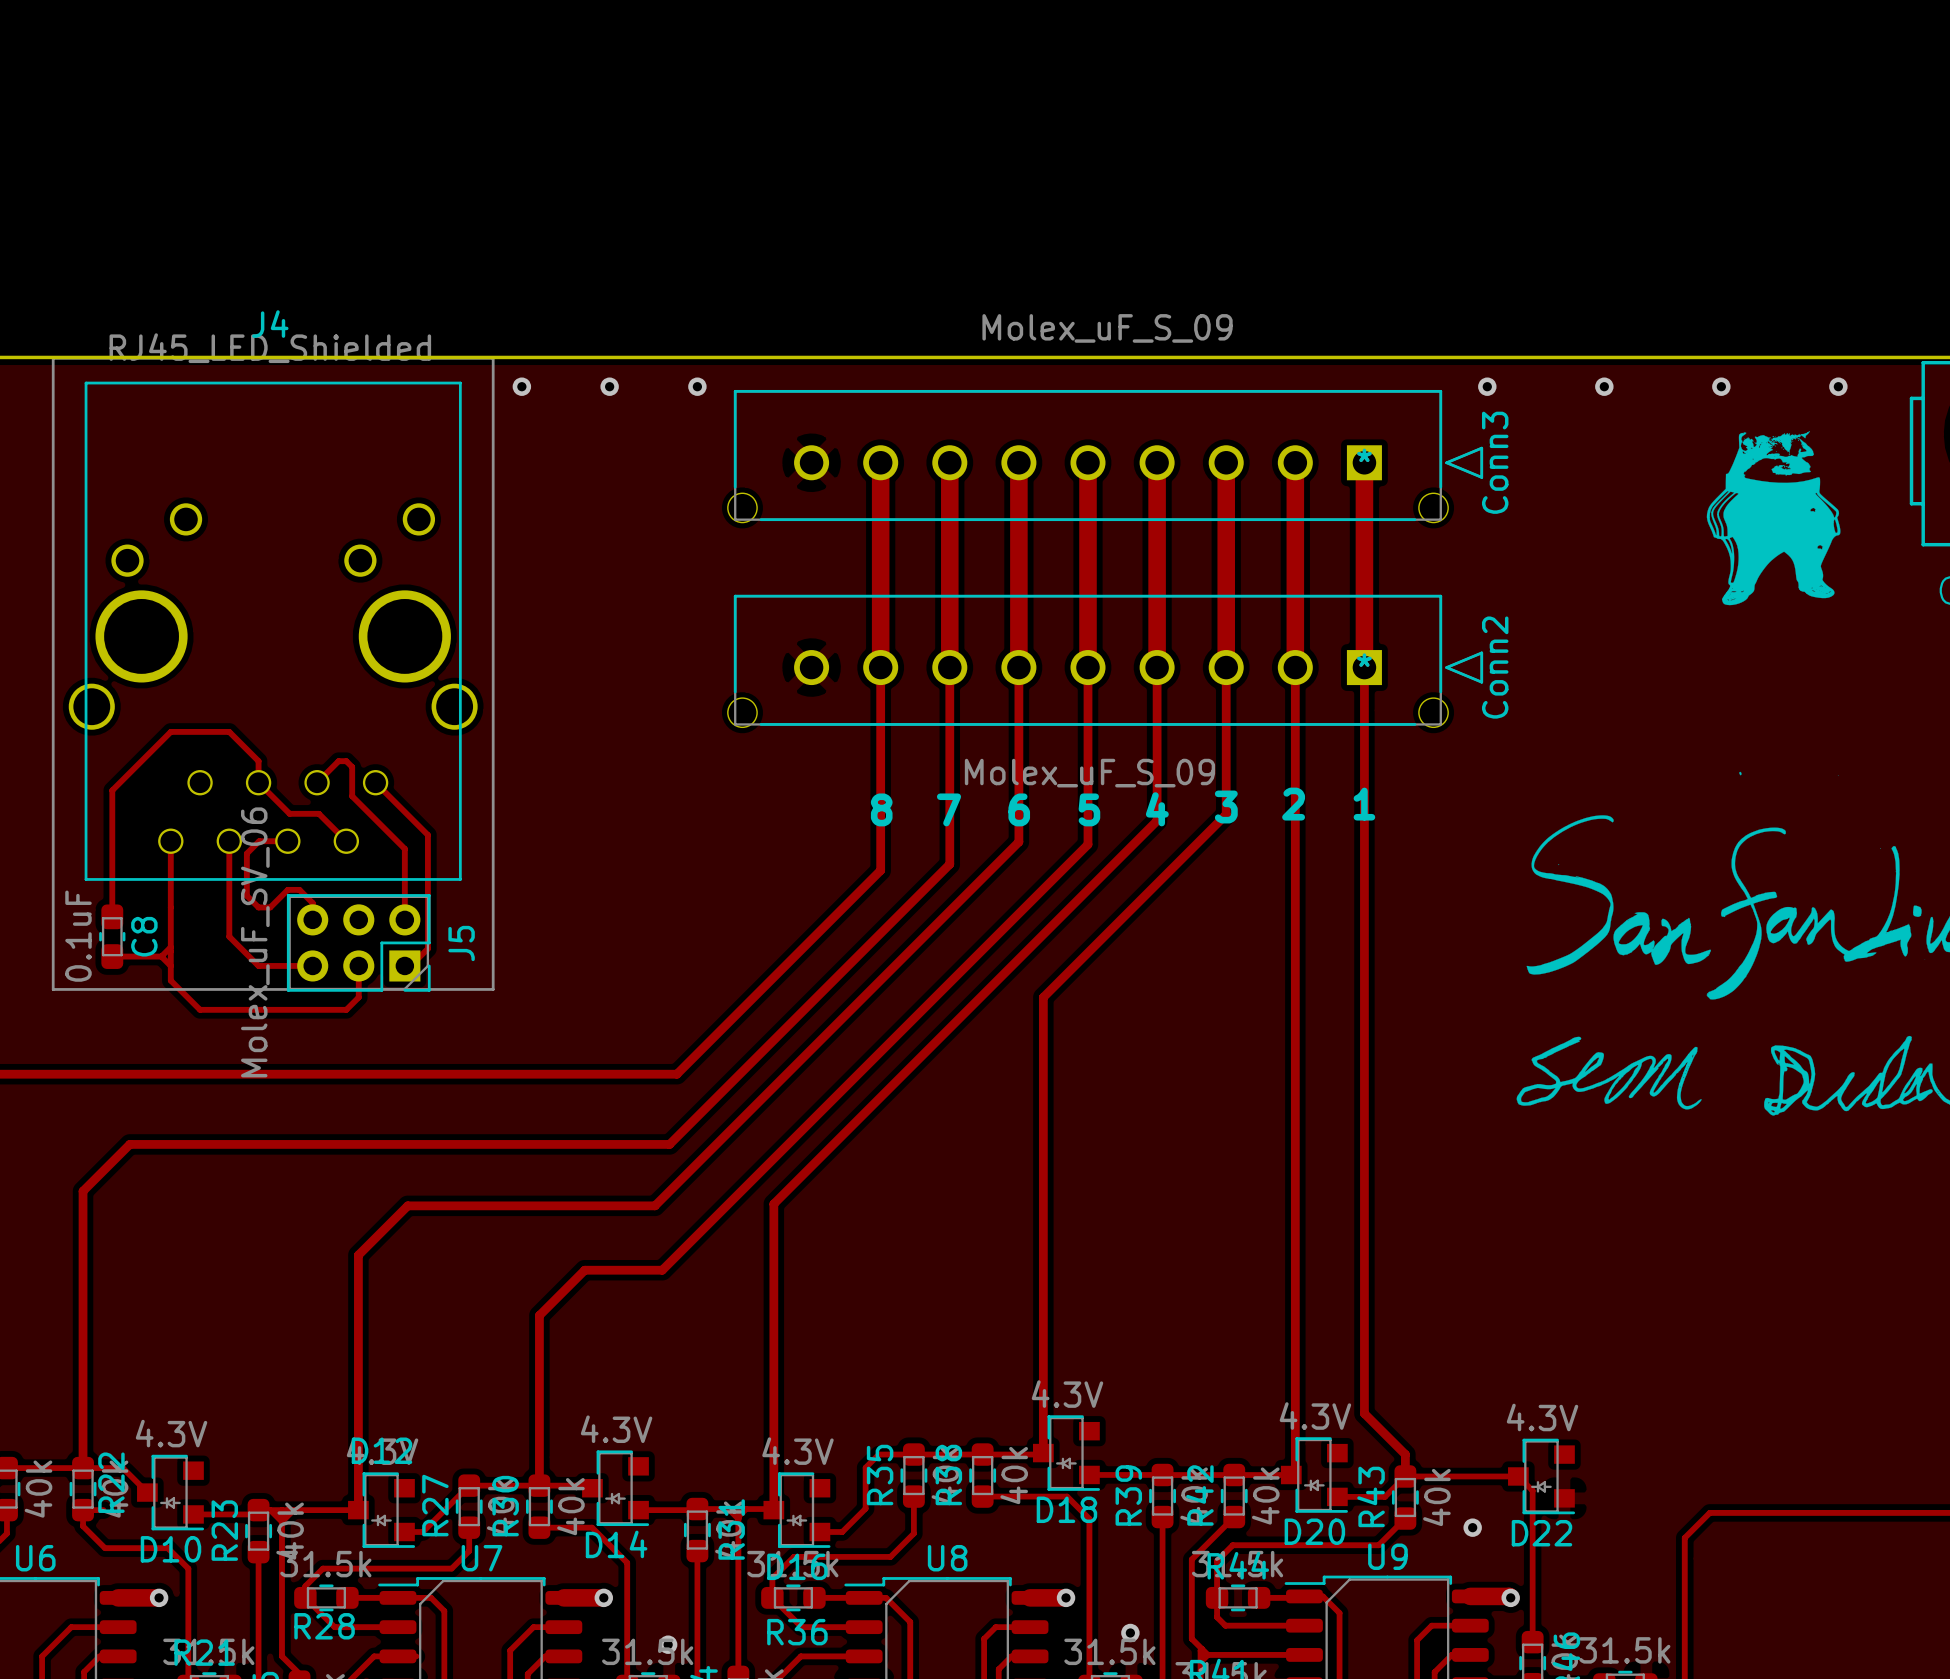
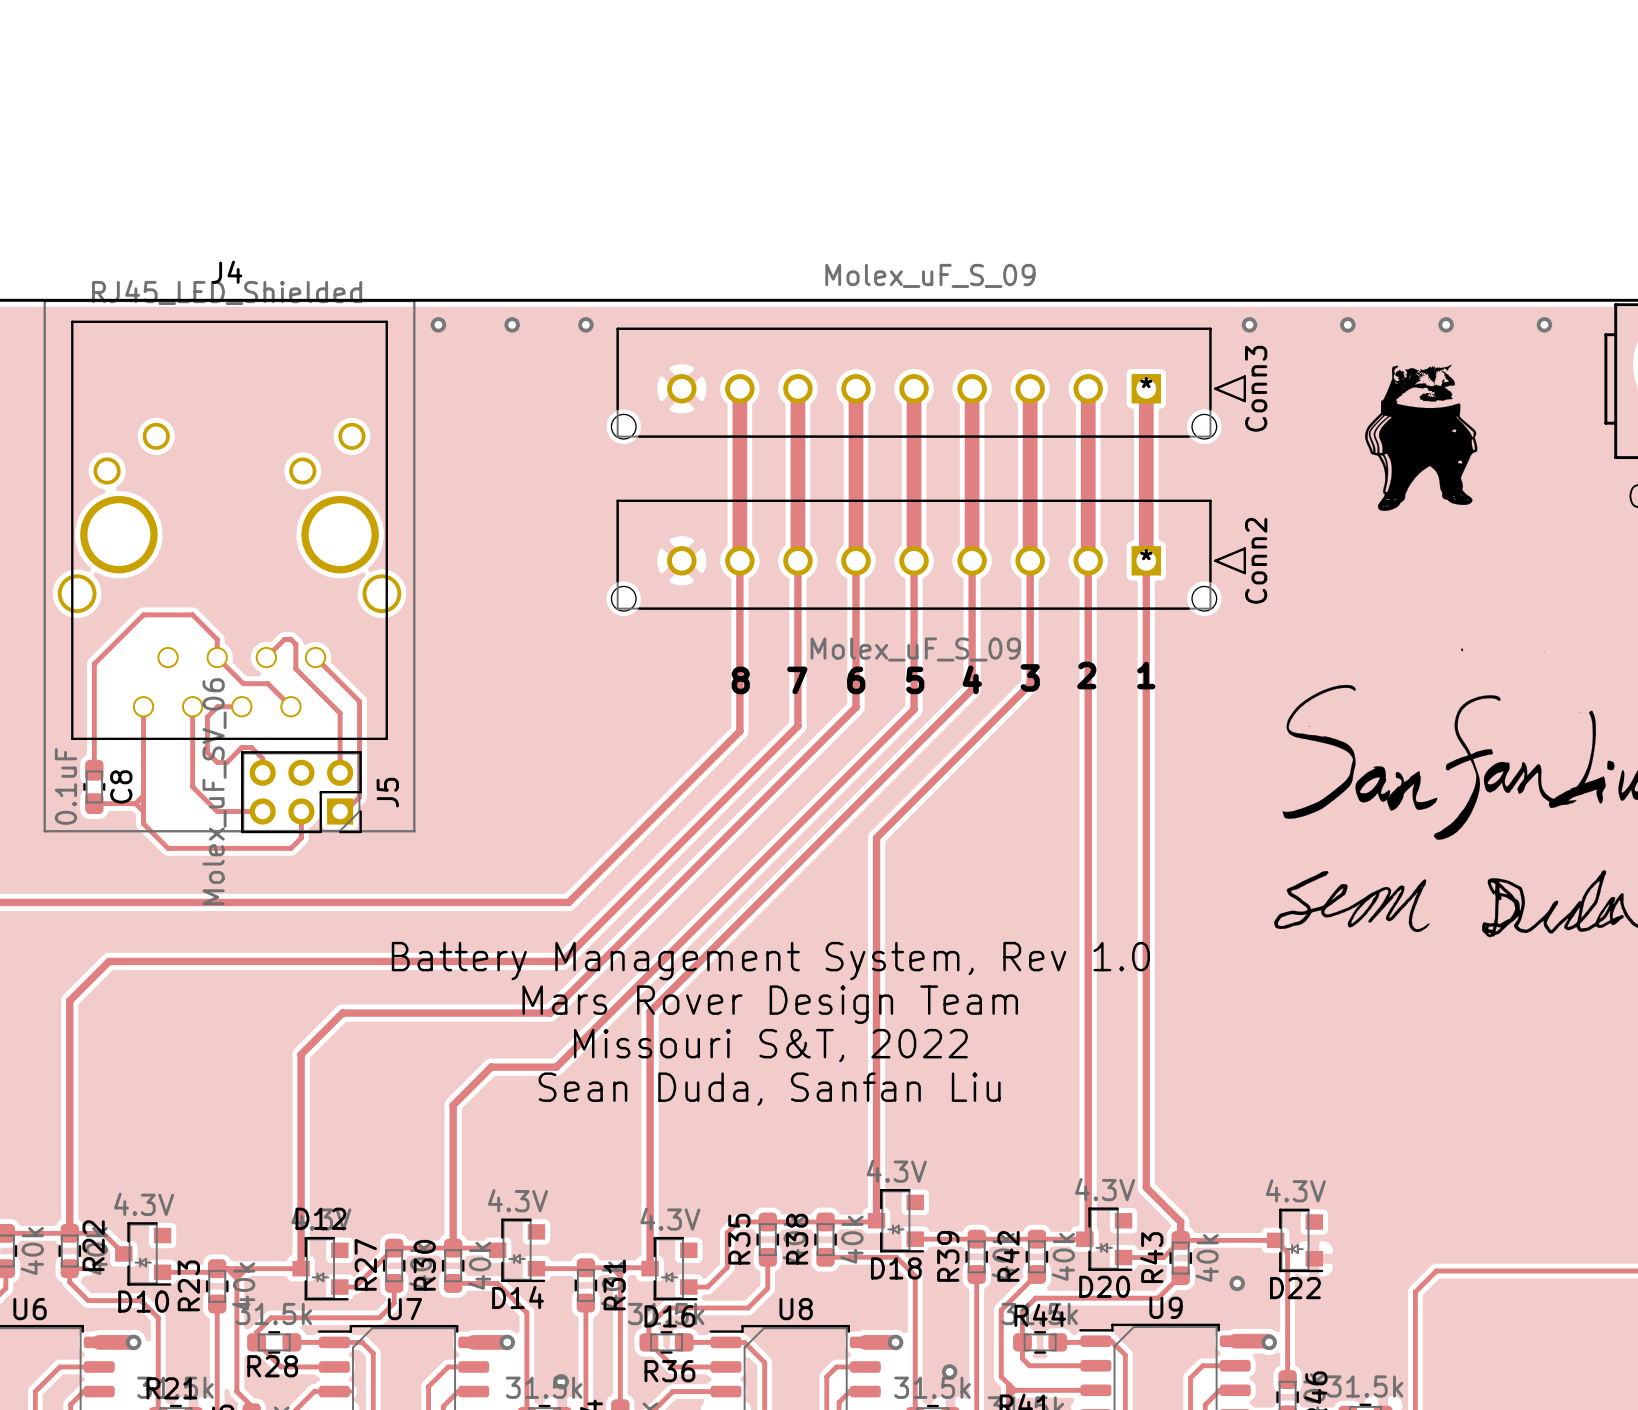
drawing position: (1773, 518) -> (1421, 437)
text: none -> Battery Management System, Rev 1.0 (770, 961)
text: none -> Mars Rover Design Team (770, 1004)
text: none -> Missouri S&T, 2022 (770, 1045)
text: none -> Sean Duda, Sanfan Liu (769, 1089)

